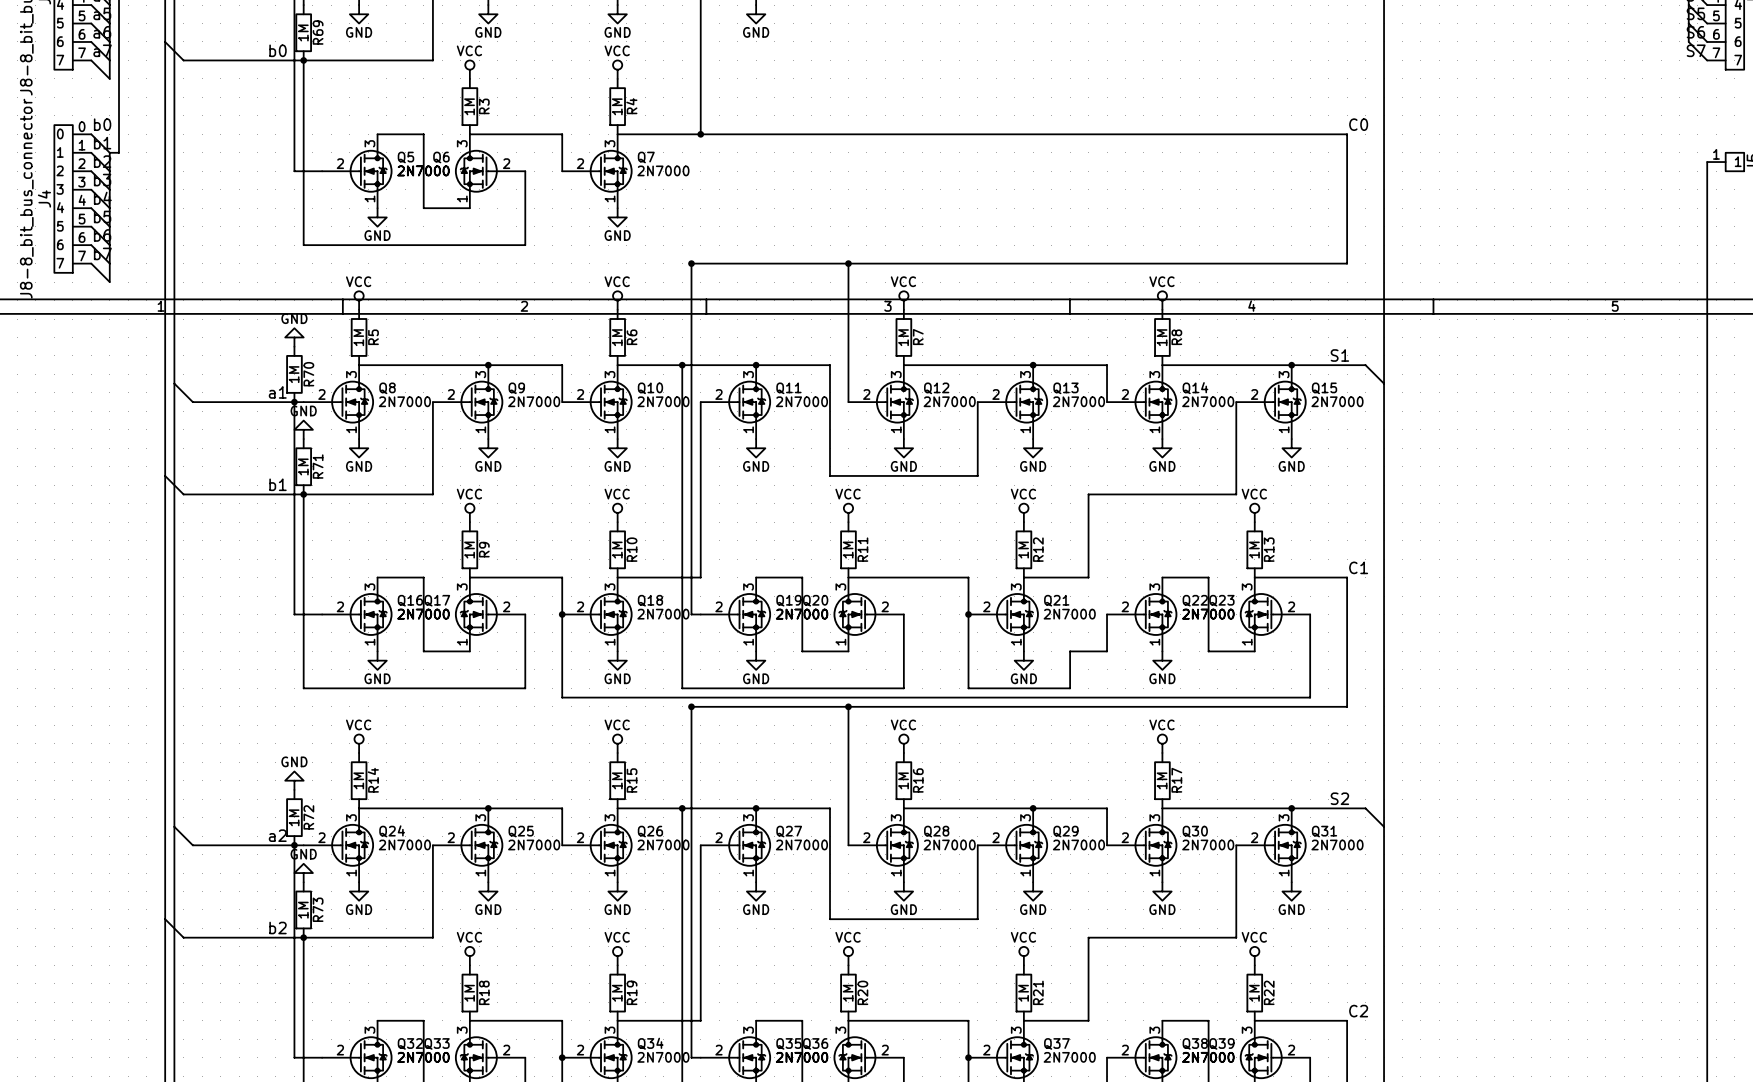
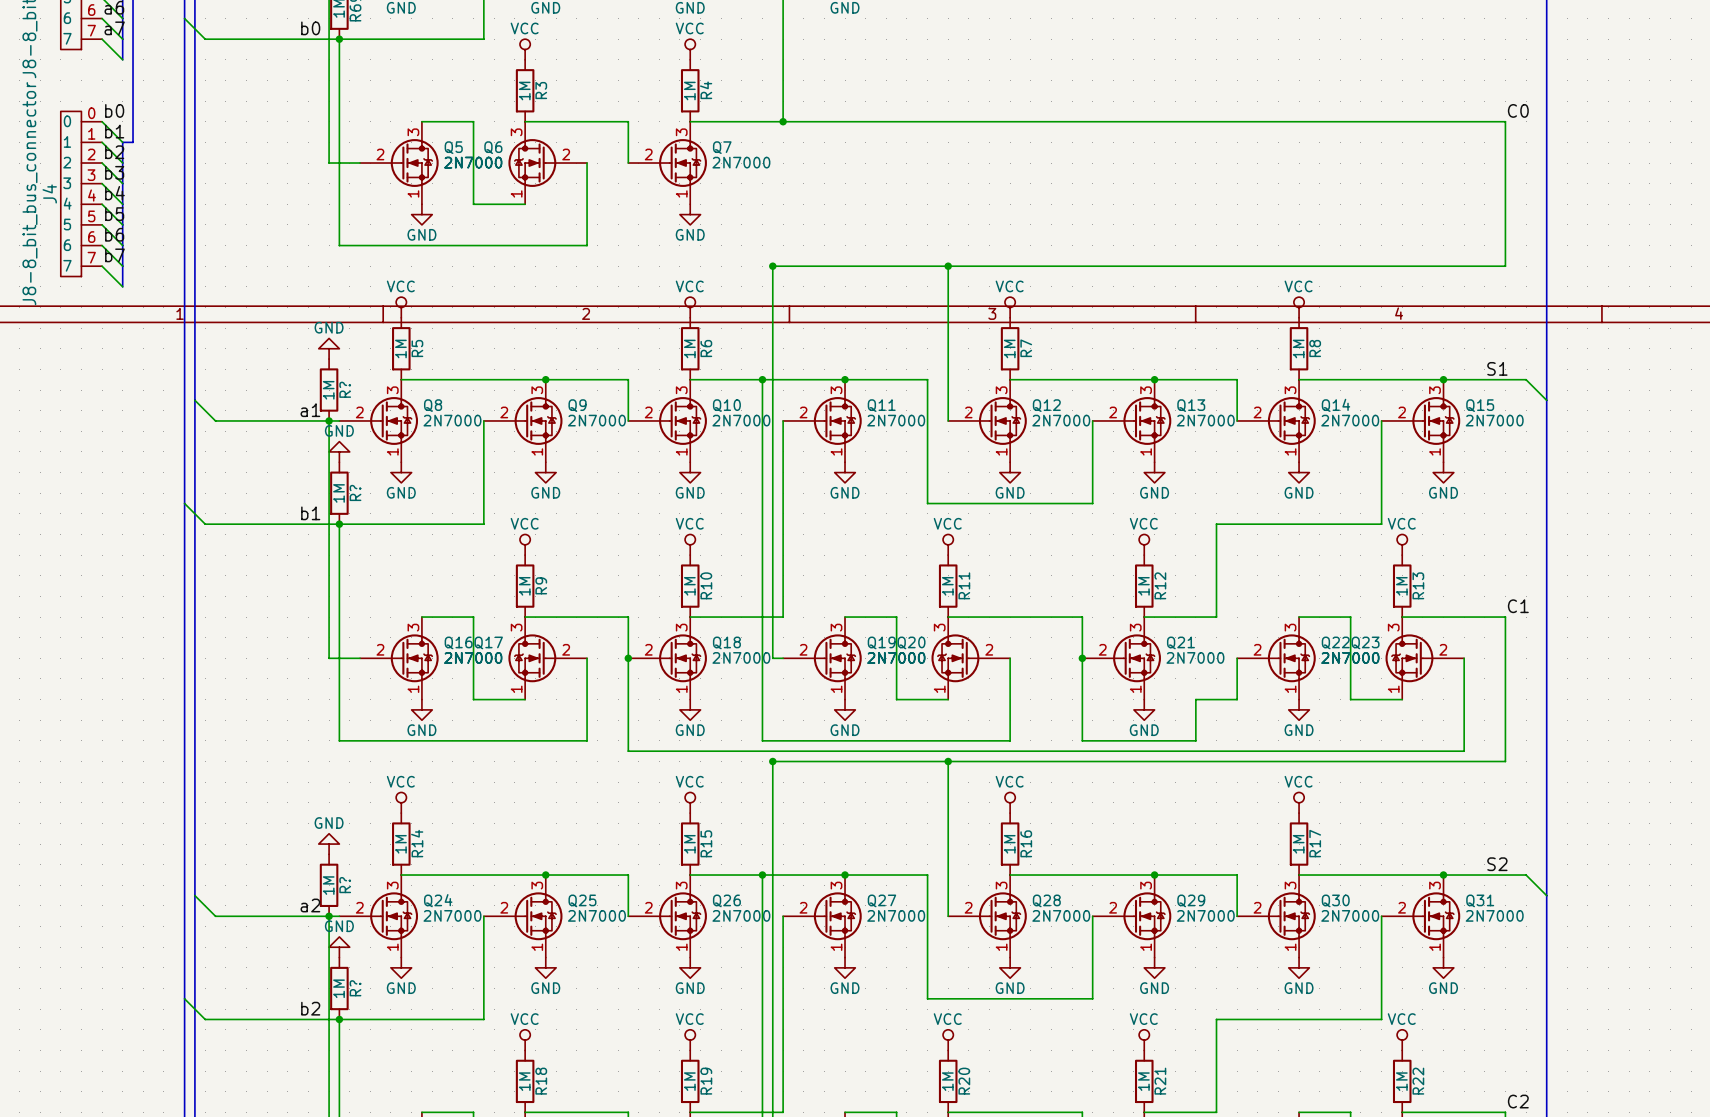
R70 name: R70 (308, 374) -> R? (345, 389)
R71 name: R71 (318, 466) -> R? (355, 492)
R72 name: R72 (308, 817) -> R? (345, 885)
R73 name: R73 (318, 909) -> R? (355, 988)

